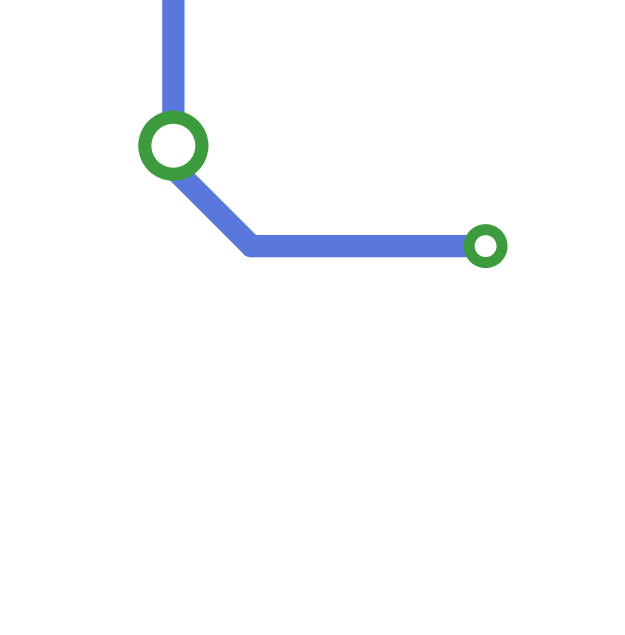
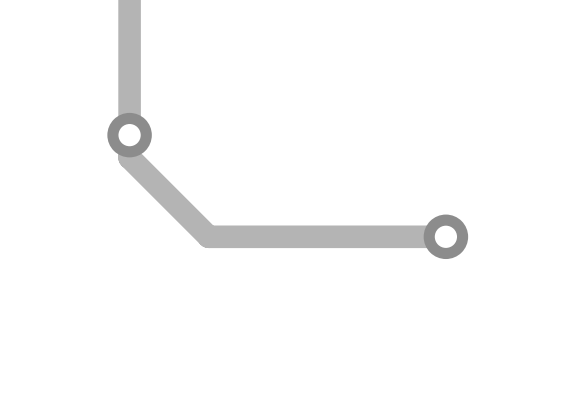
via size: [138, 110, 209, 181] -> [107, 112, 152, 158]

